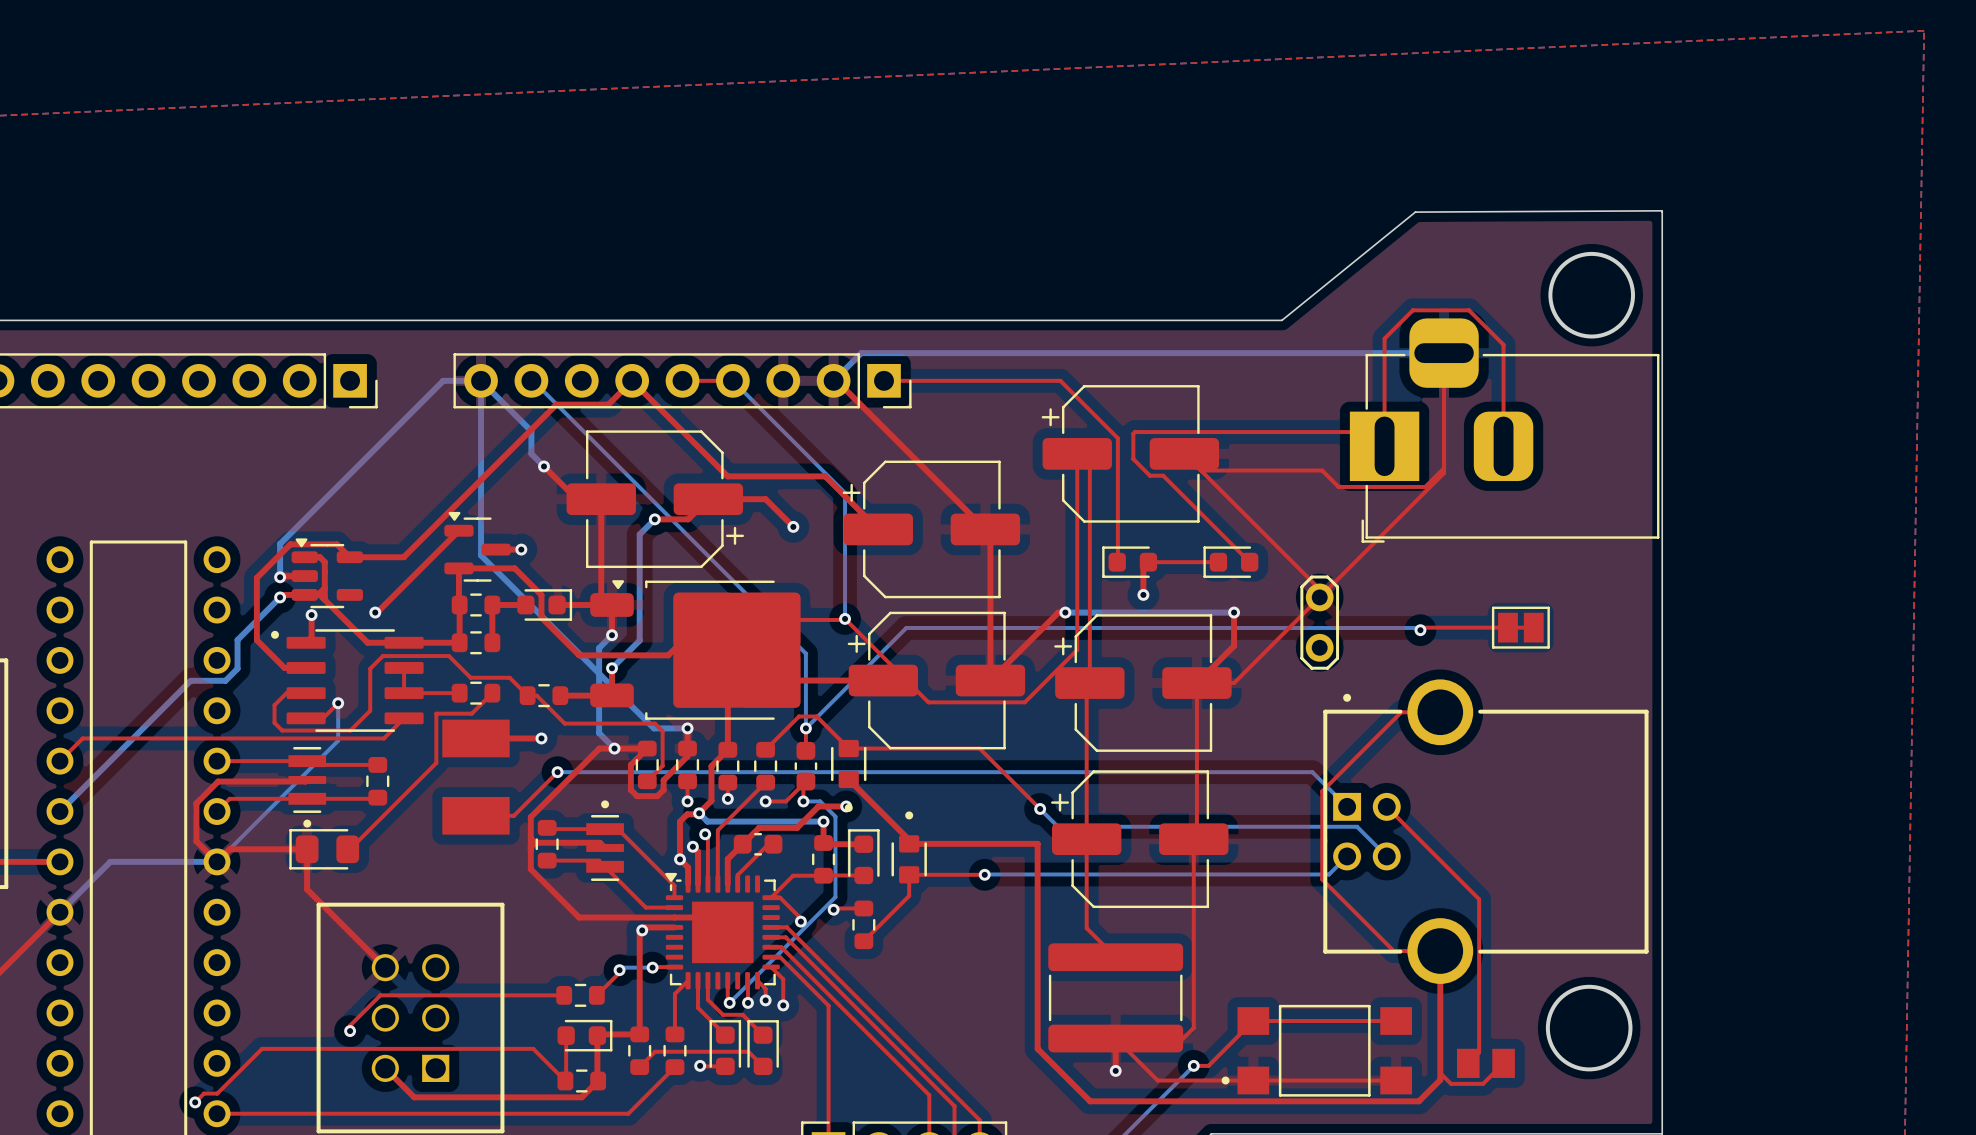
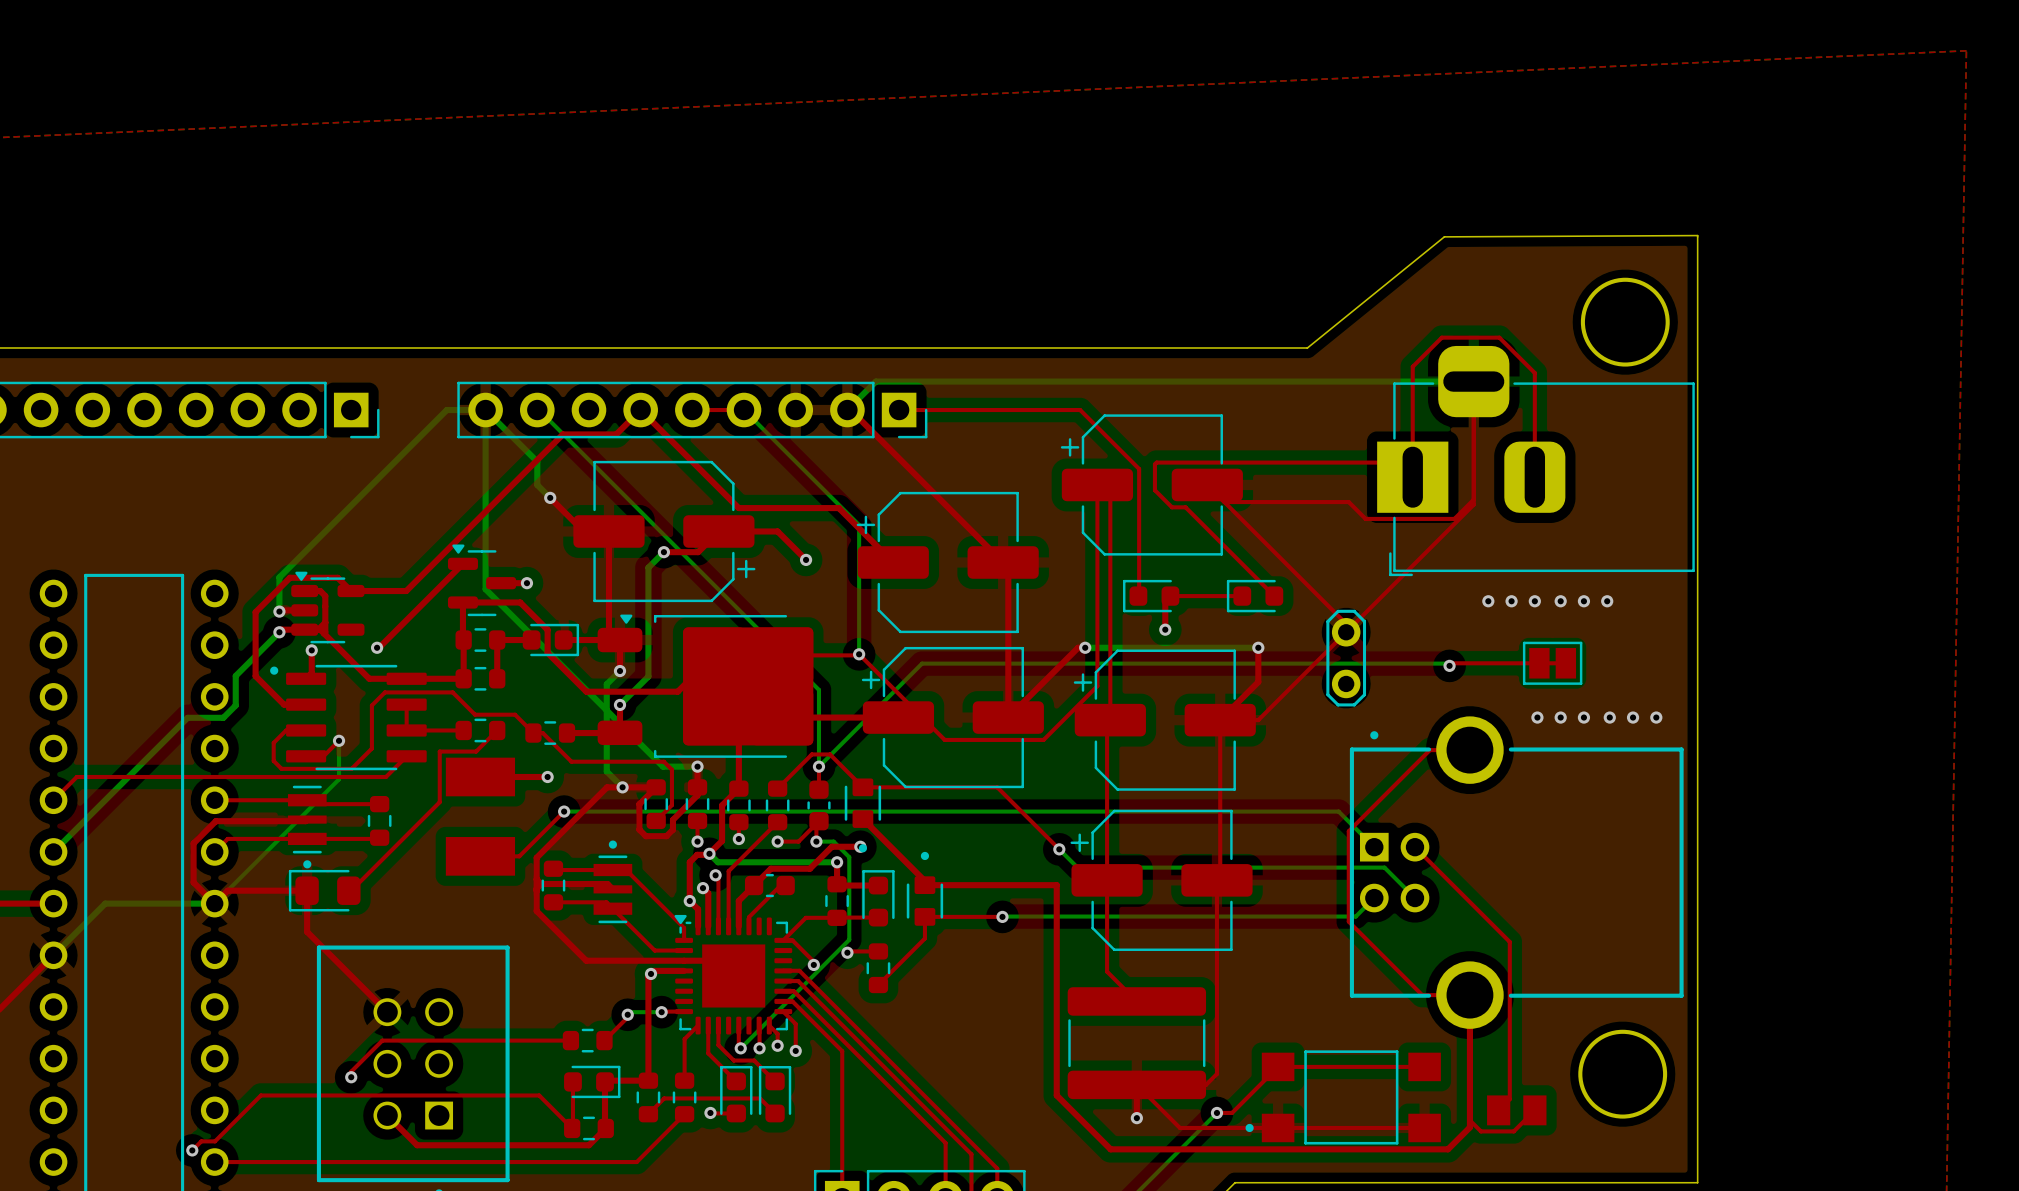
via: none -> (1488, 601)
via: none -> (1511, 601)
via: none -> (1534, 601)
via: none -> (1560, 601)
via: none -> (1583, 601)
via: none -> (1607, 601)
via: none -> (1537, 717)
via: none -> (1560, 717)
via: none -> (1583, 717)
via: none -> (1609, 717)
via: none -> (1633, 717)
via: none -> (1656, 717)

